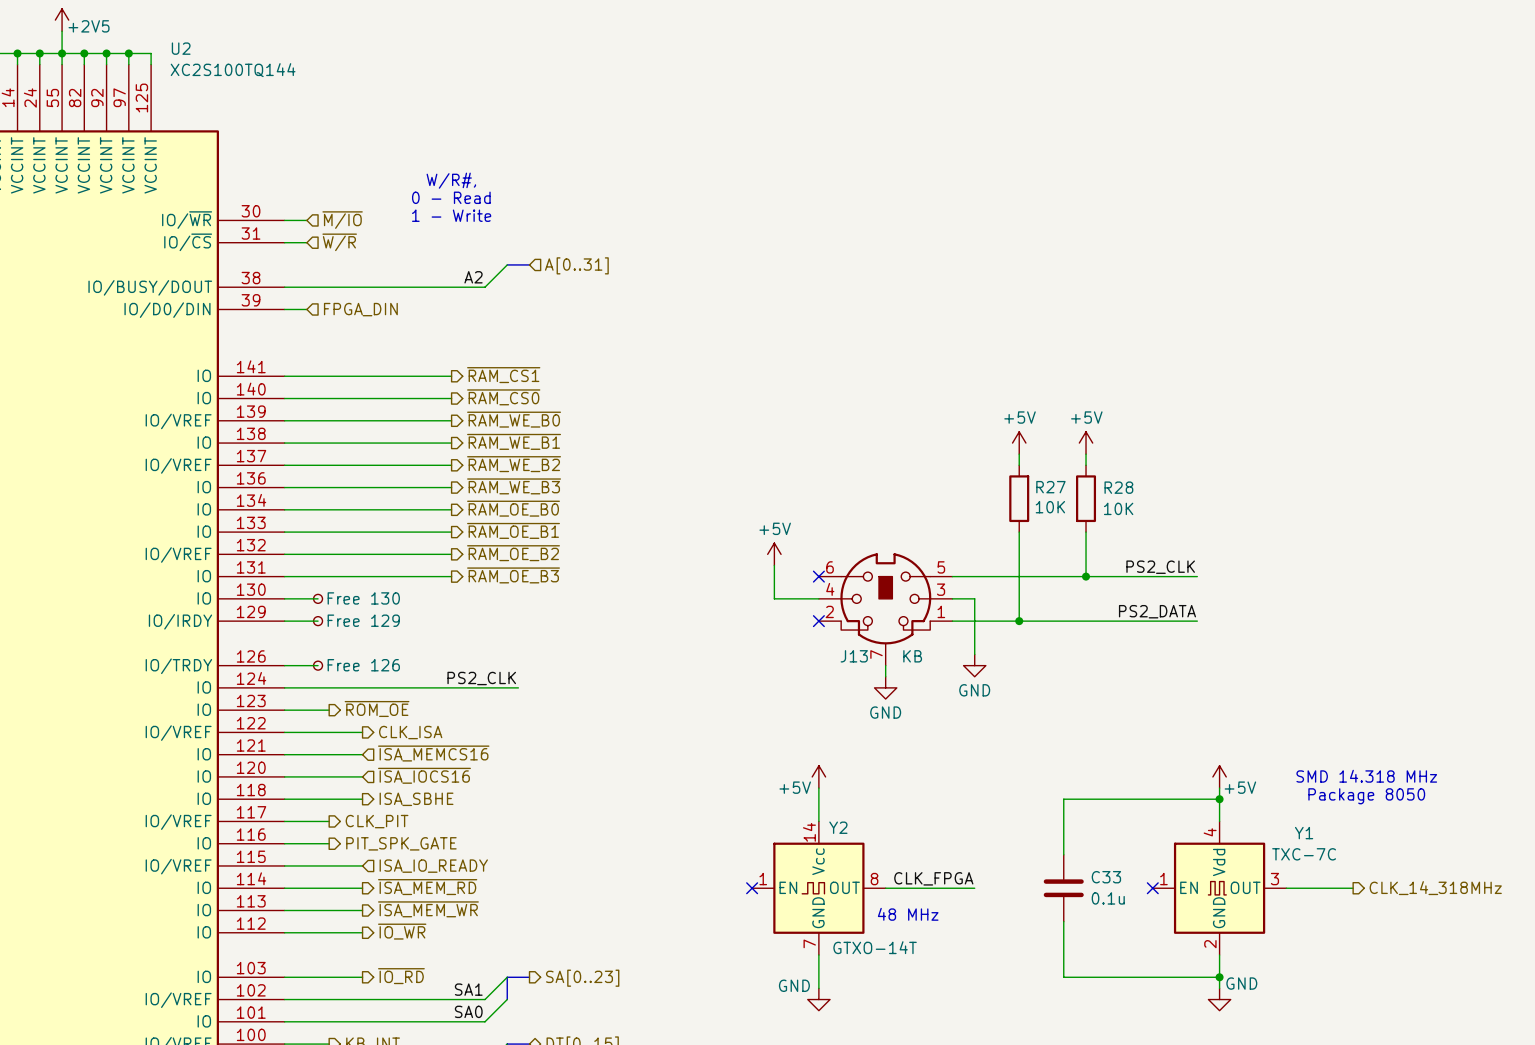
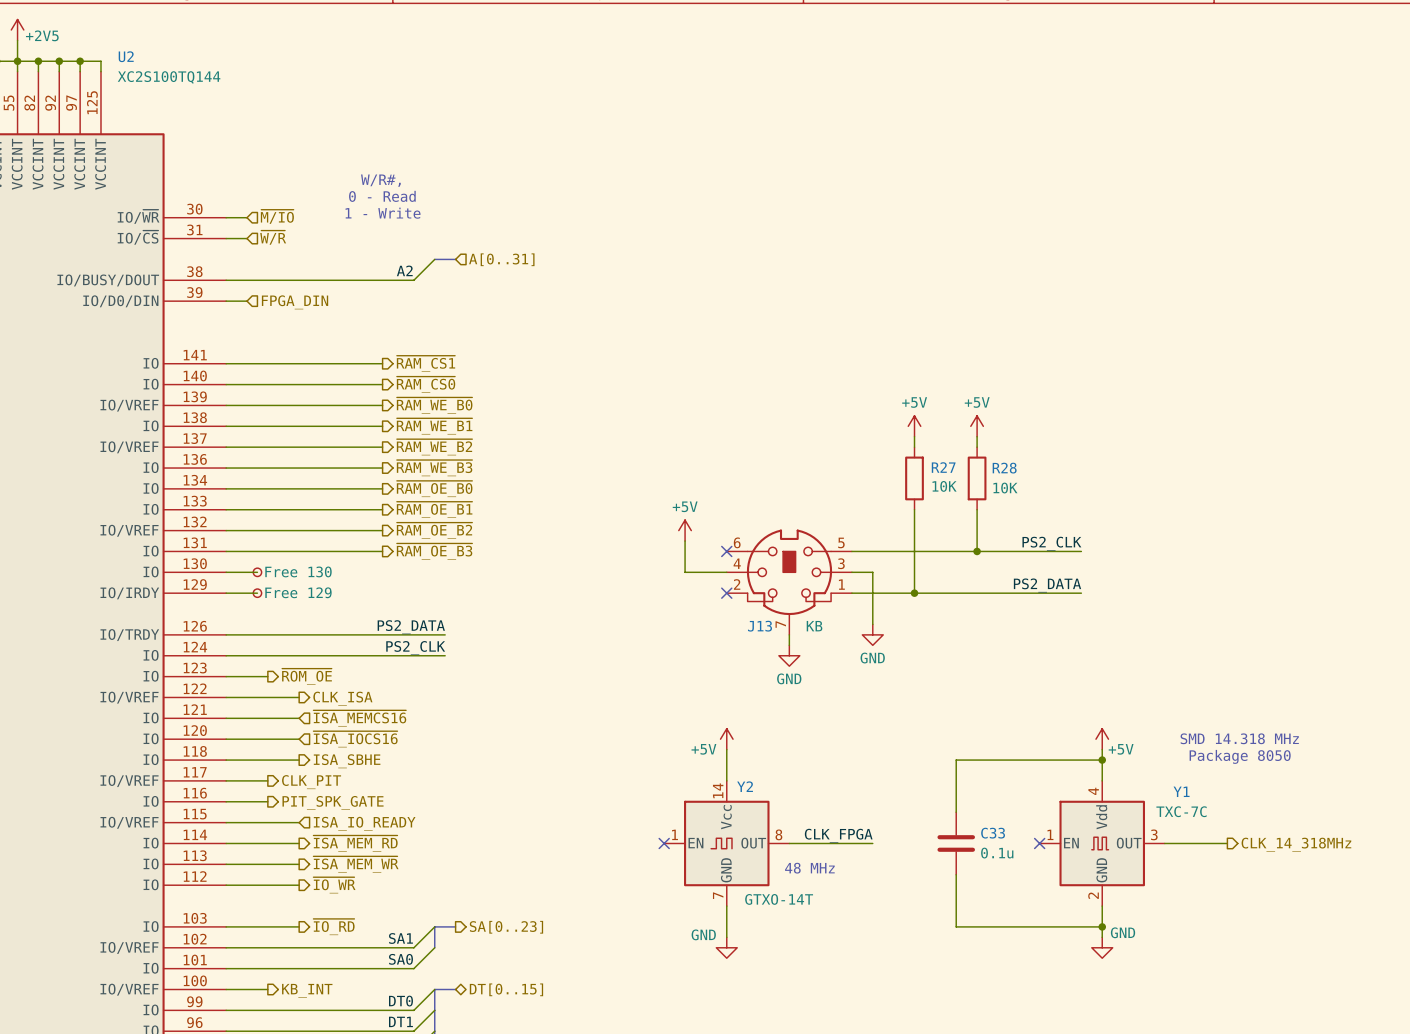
label: none -> PS2_DATA (411, 627)
wire: none -> (257, 634) (445, 634)
part: Free 126 (318, 665) -> none

